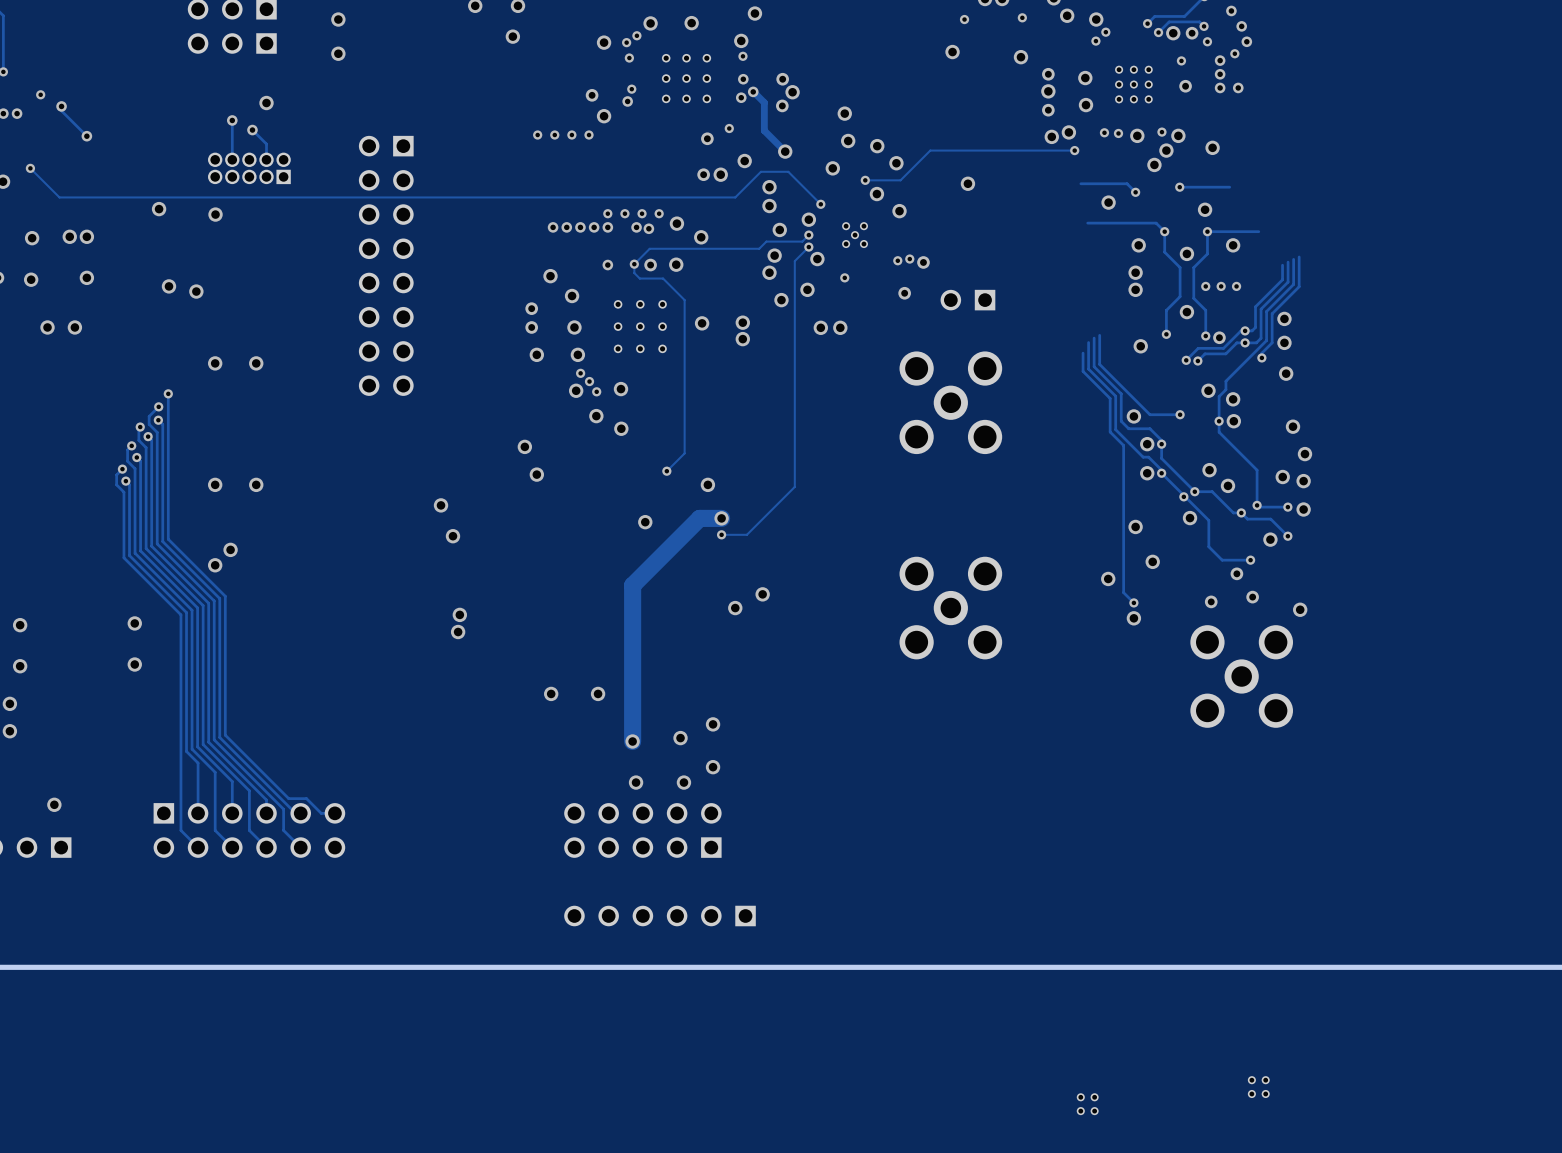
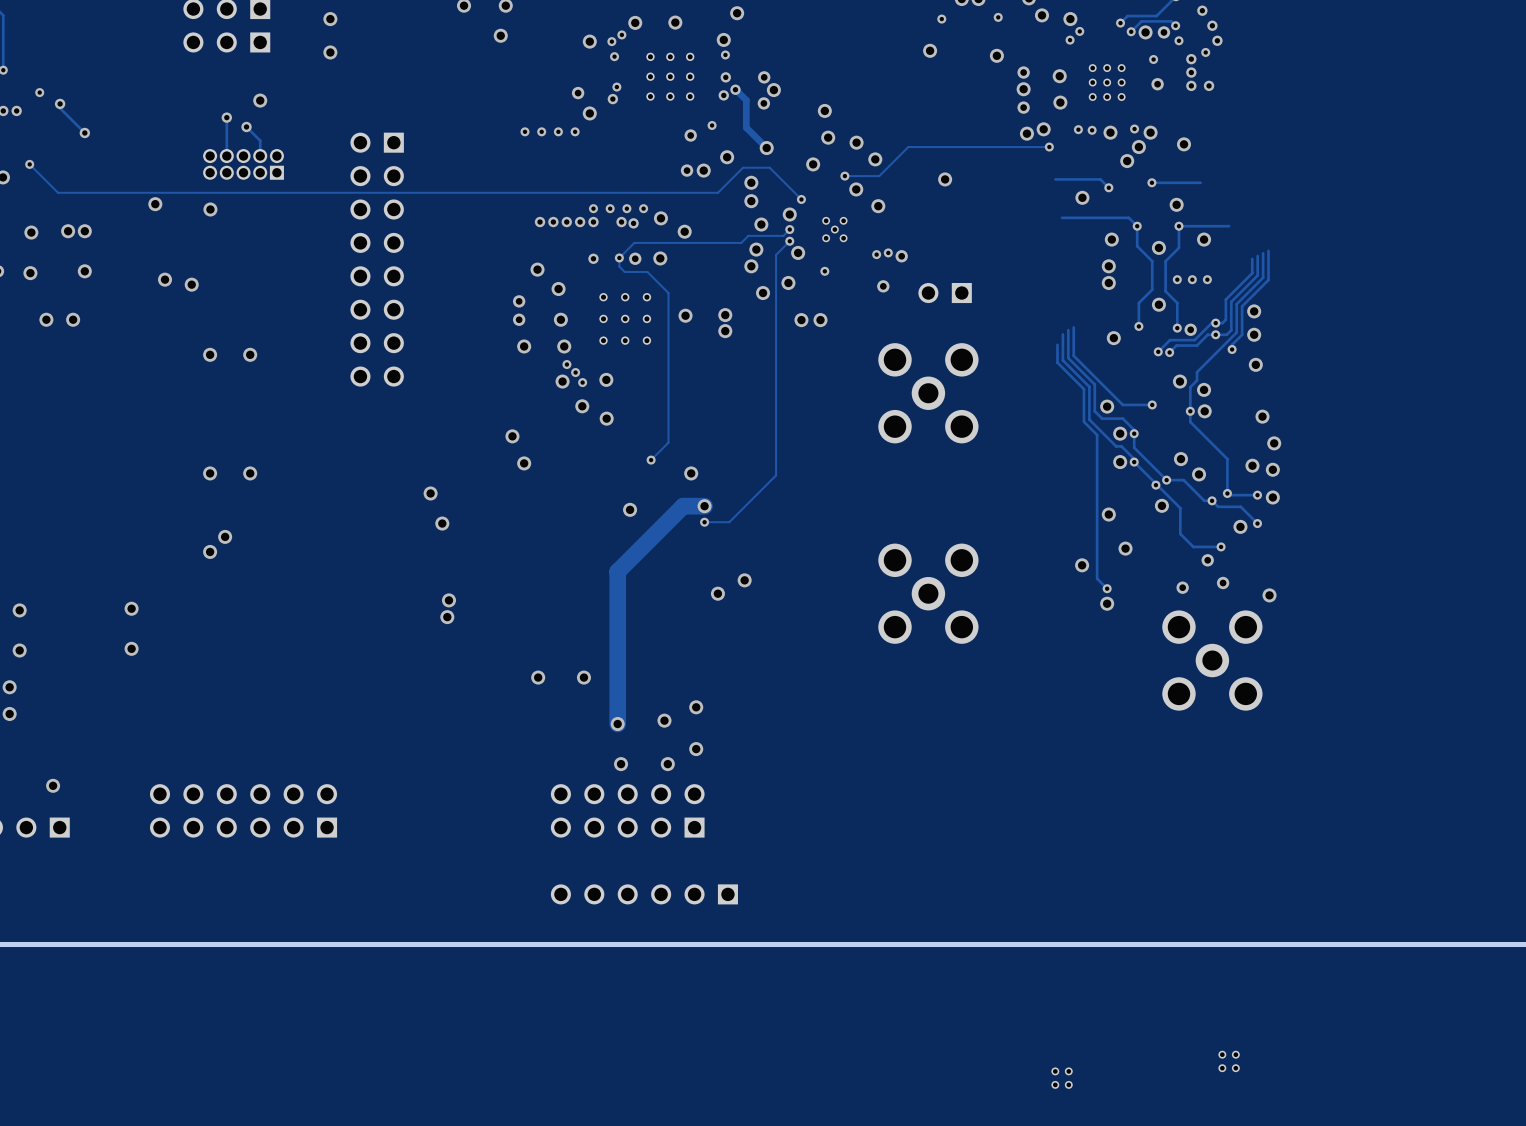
track: (168, 393) (168, 539) (225, 596) (225, 735) (288, 798) (306, 798) (321, 813) (334, 813) -> none
via: (168, 393) -> none
track: (158, 406) (149, 416) (149, 424) (157, 432) (157, 543) (214, 600) (214, 739) (283, 809) (283, 830) (300, 847) -> none
via: (158, 406) -> none
track: (158, 420) (162, 424) (162, 541) (219, 598) (219, 737) (295, 813) (300, 813) -> none
via: (158, 420) -> none
track: (140, 427) (138, 440) (146, 447) (146, 548) (203, 605) (203, 744) (249, 790) (249, 830) (266, 847) -> none
via: (140, 427) -> none
track: (148, 436) (151, 440) (151, 546) (208, 603) (208, 742) (266, 800) (266, 813) -> none
via: (148, 436) -> none
track: (131, 445) (127, 449) (127, 461) (135, 468) (135, 553) (192, 610) (192, 749) (215, 772) (215, 830) (232, 847) -> none
via: (131, 445) -> none
track: (136, 457) (140, 461) (140, 550) (197, 607) (197, 746) (232, 781) (232, 813) -> none
via: (136, 457) -> none
track: (122, 469) (116, 474) (116, 484) (123, 492) (123, 557) (180, 614) (180, 830) (198, 847) -> none
via: (122, 469) -> none
track: (125, 481) (129, 484) (129, 555) (186, 612) (186, 751) (198, 763) (198, 813) -> none
via: (125, 481) -> none
part rotation: 0° (249, 830) -> 180° (243, 810)

